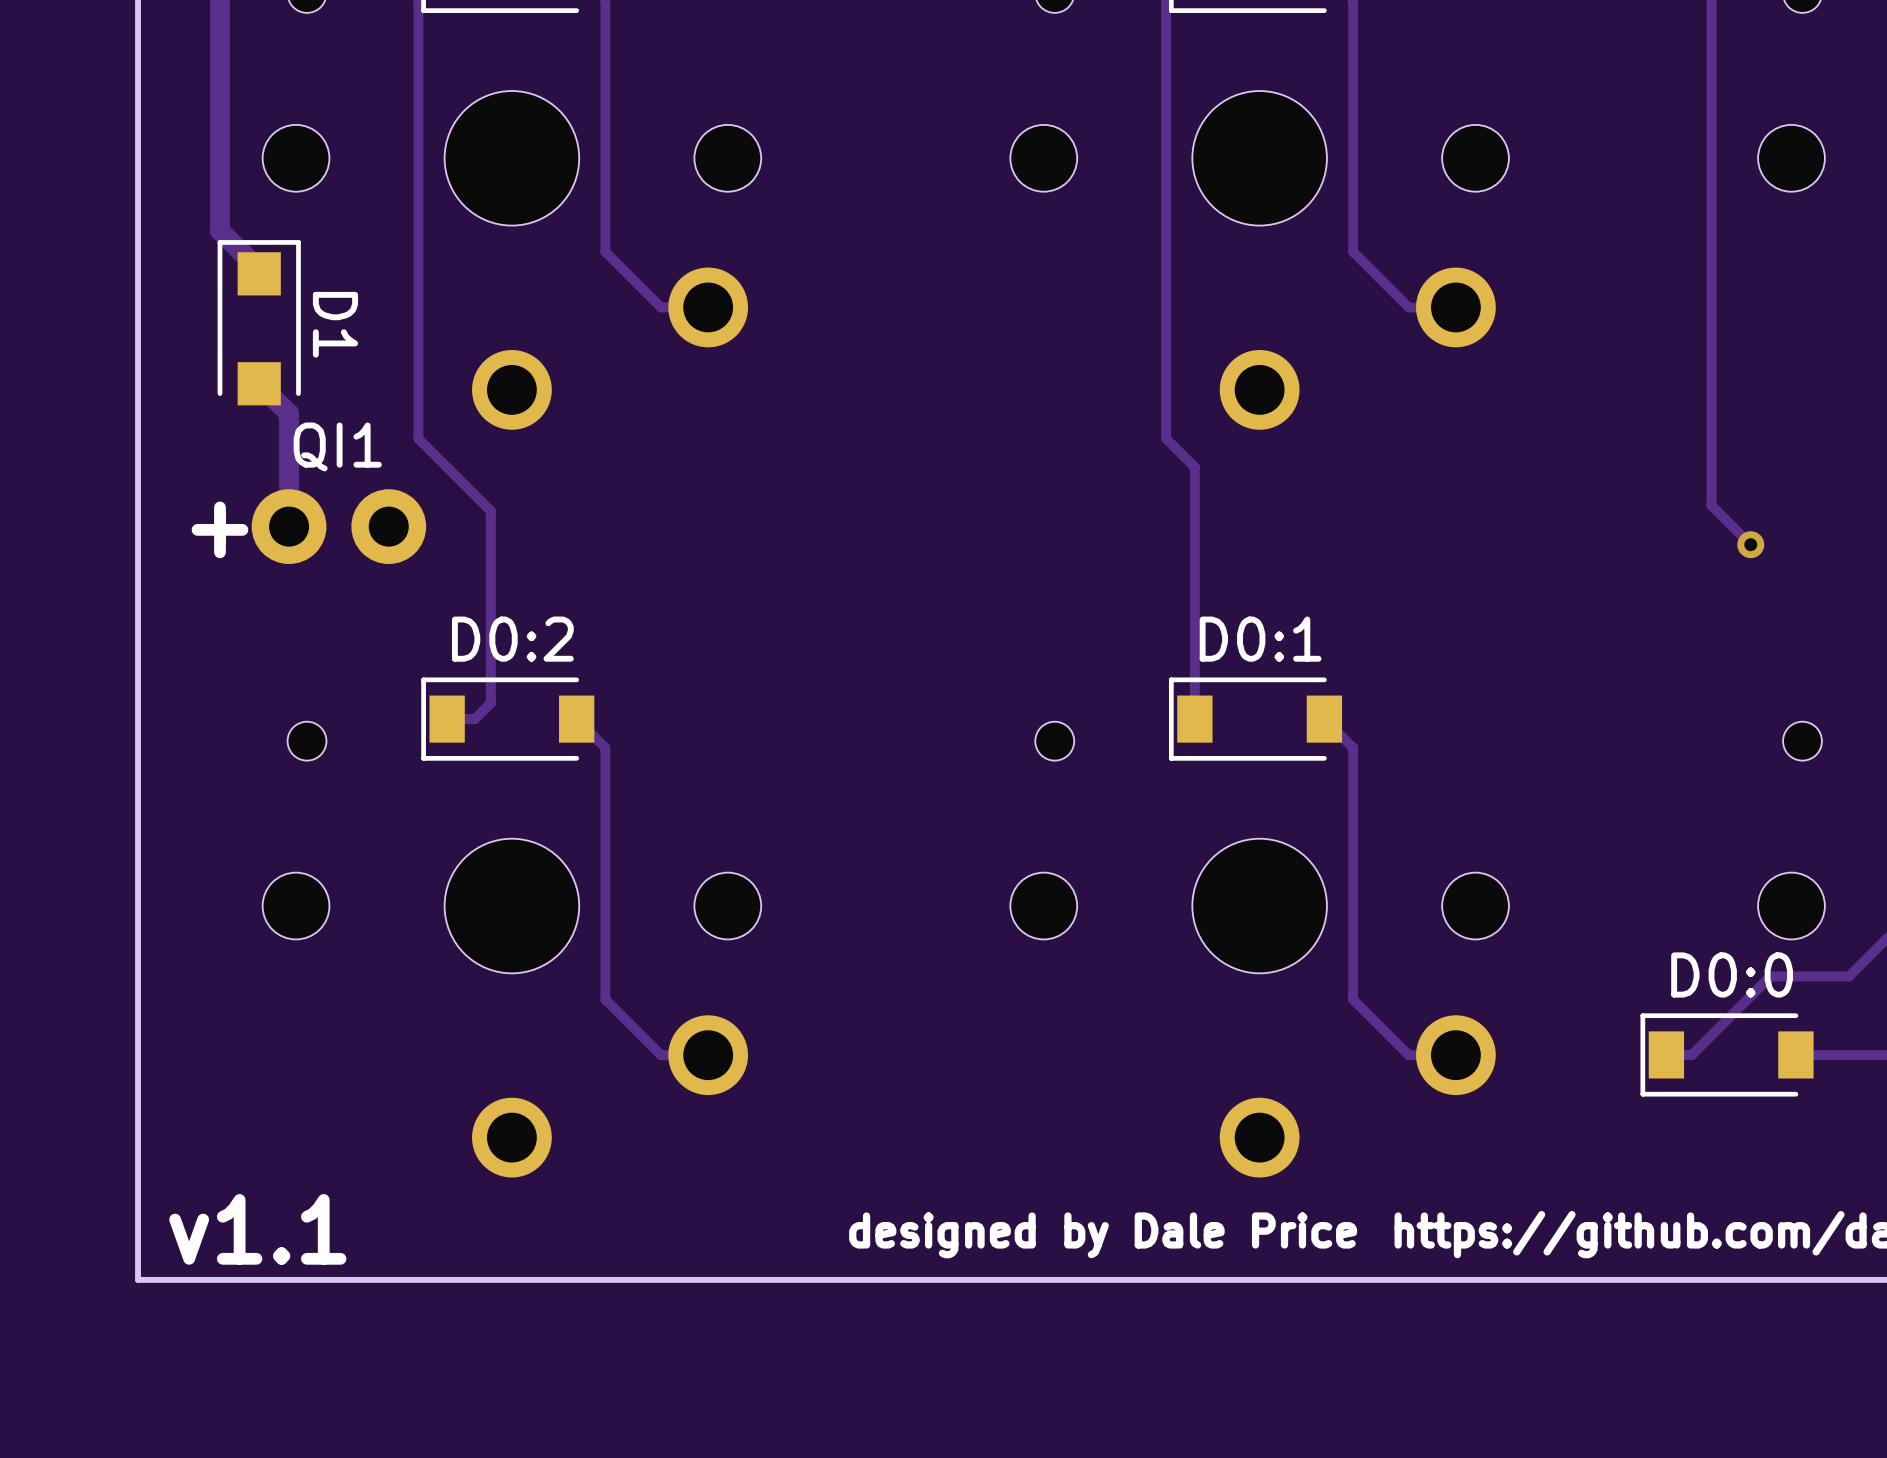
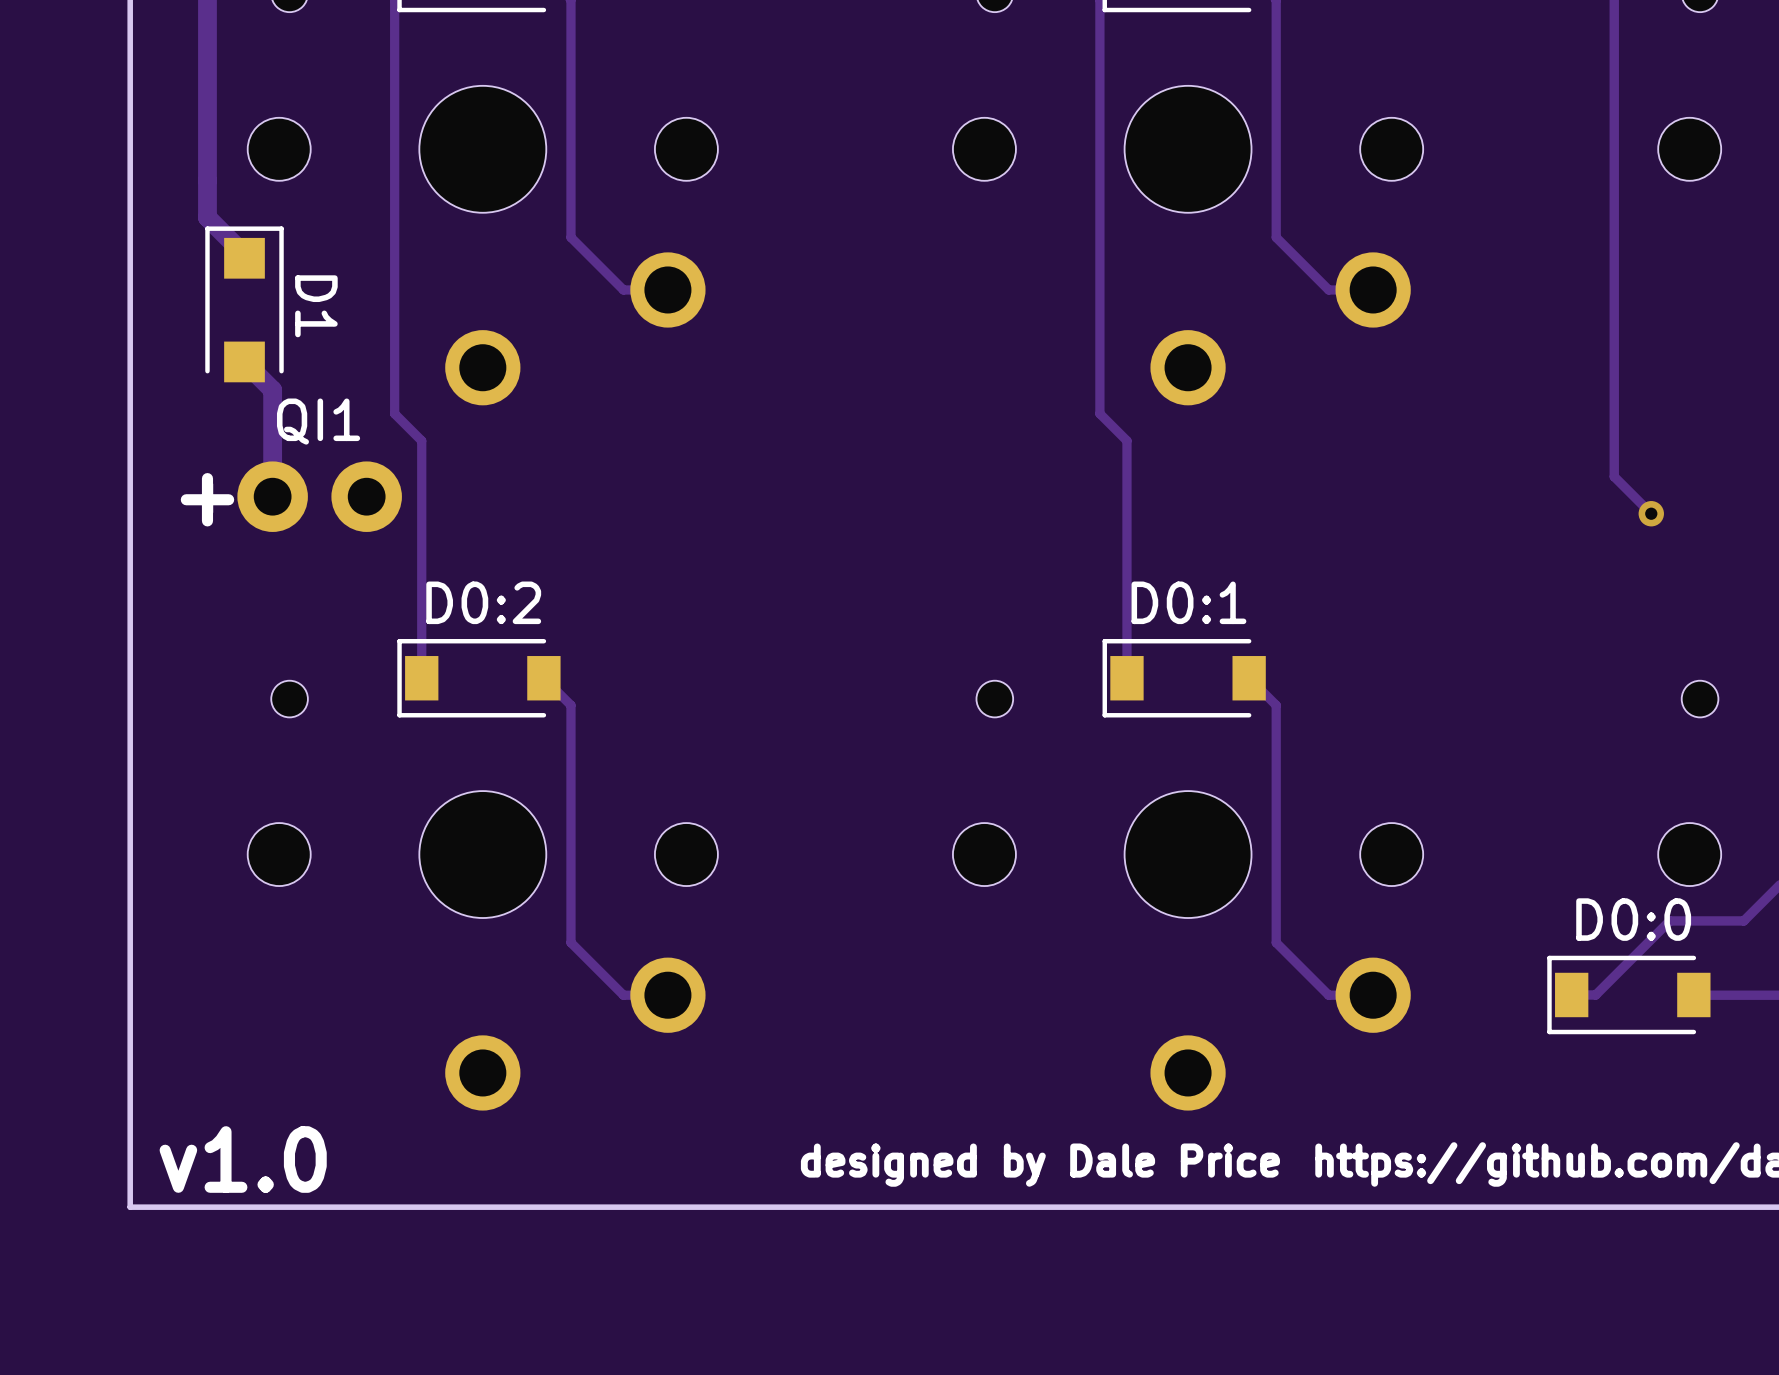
track: (447, 467) (490, 511) (490, 703) (474, 719) (447, 719) -> (421, 440) (421, 678)
text: v1.1 (257, 1229) -> v1.0 (243, 1159)

